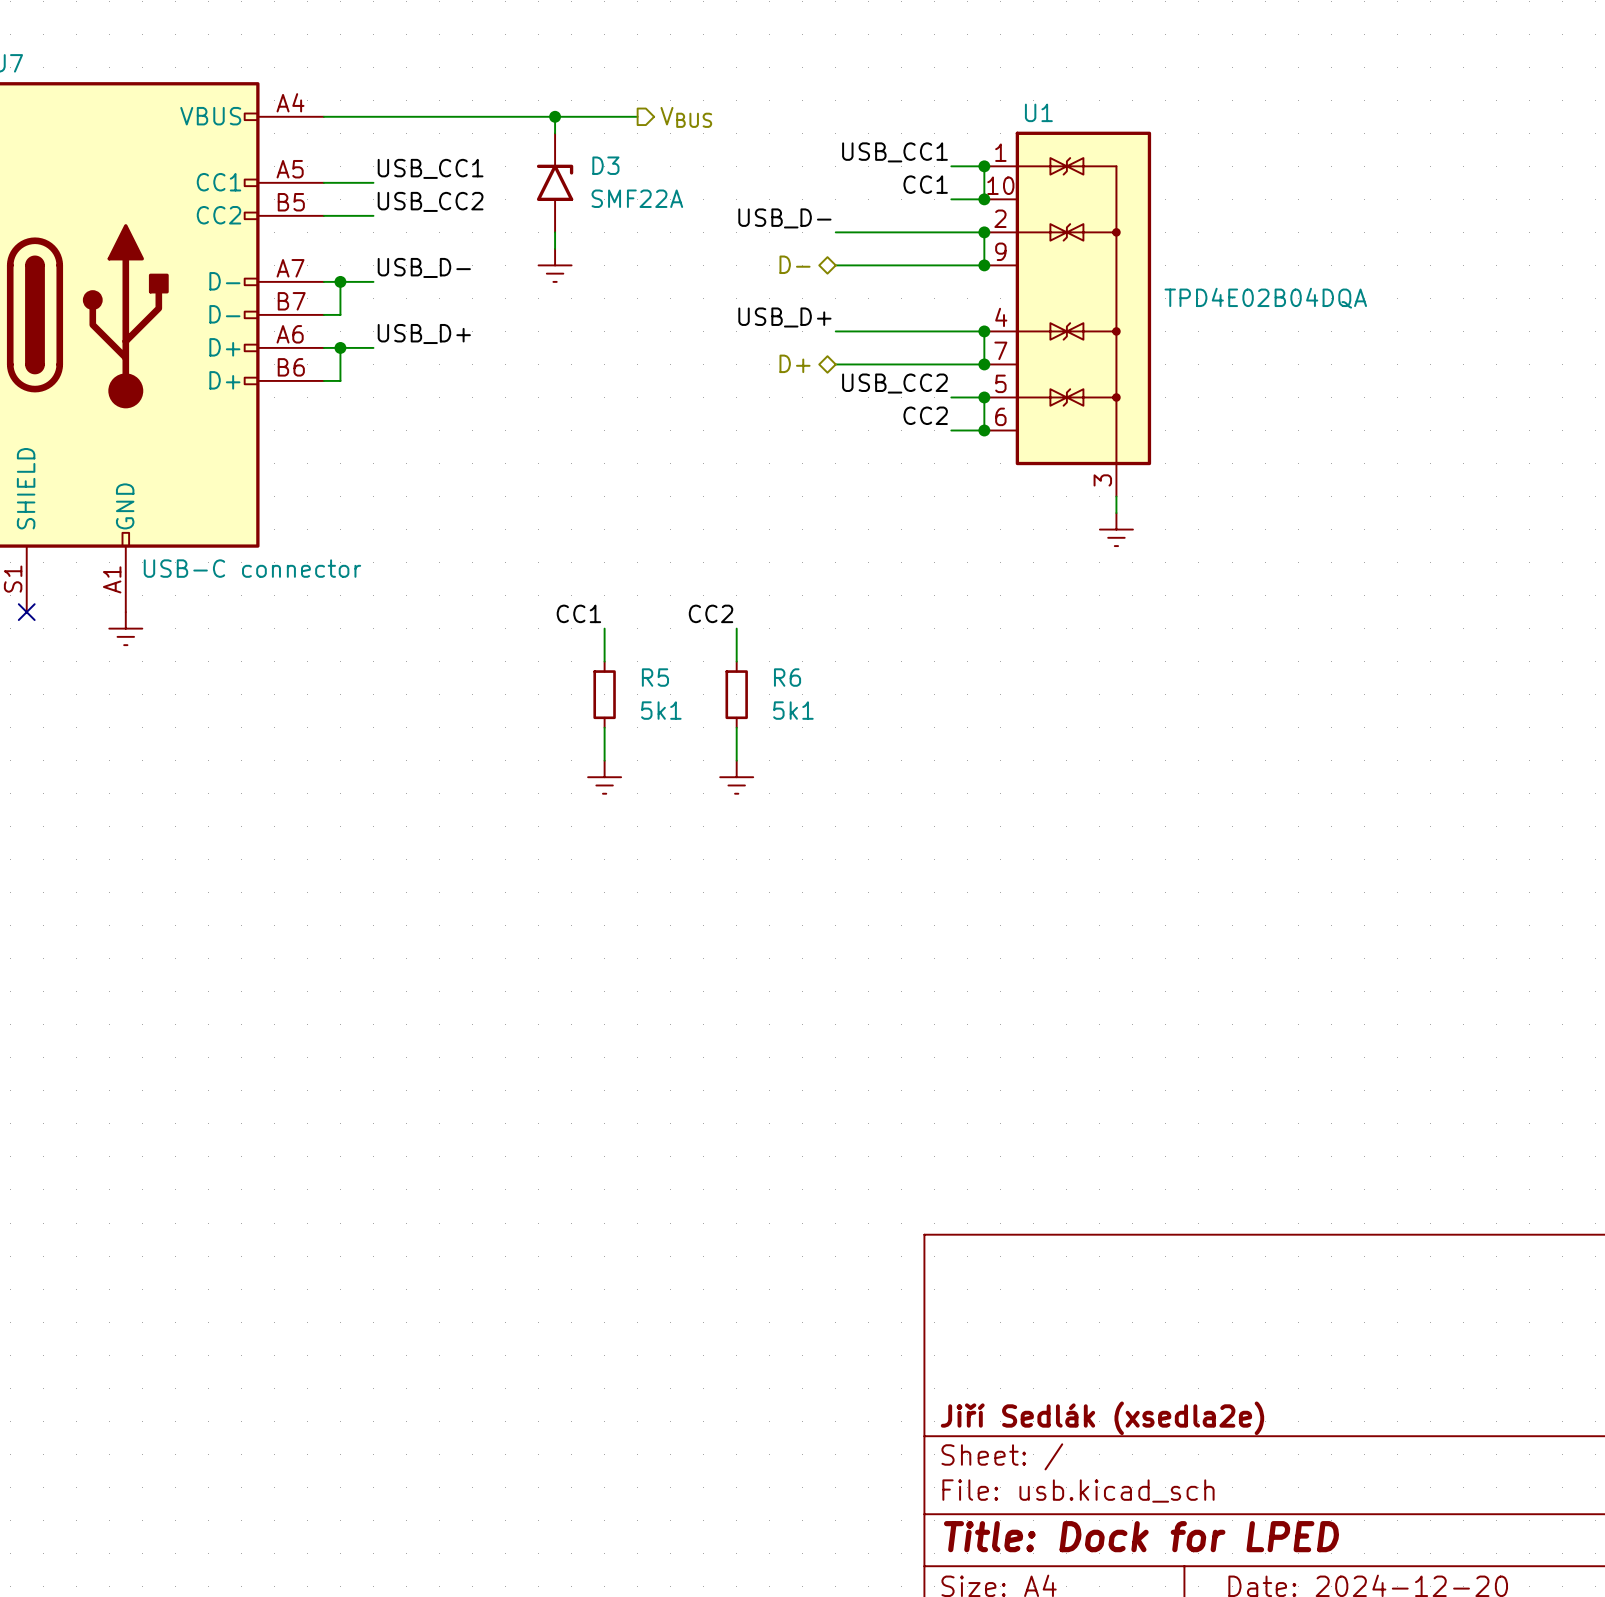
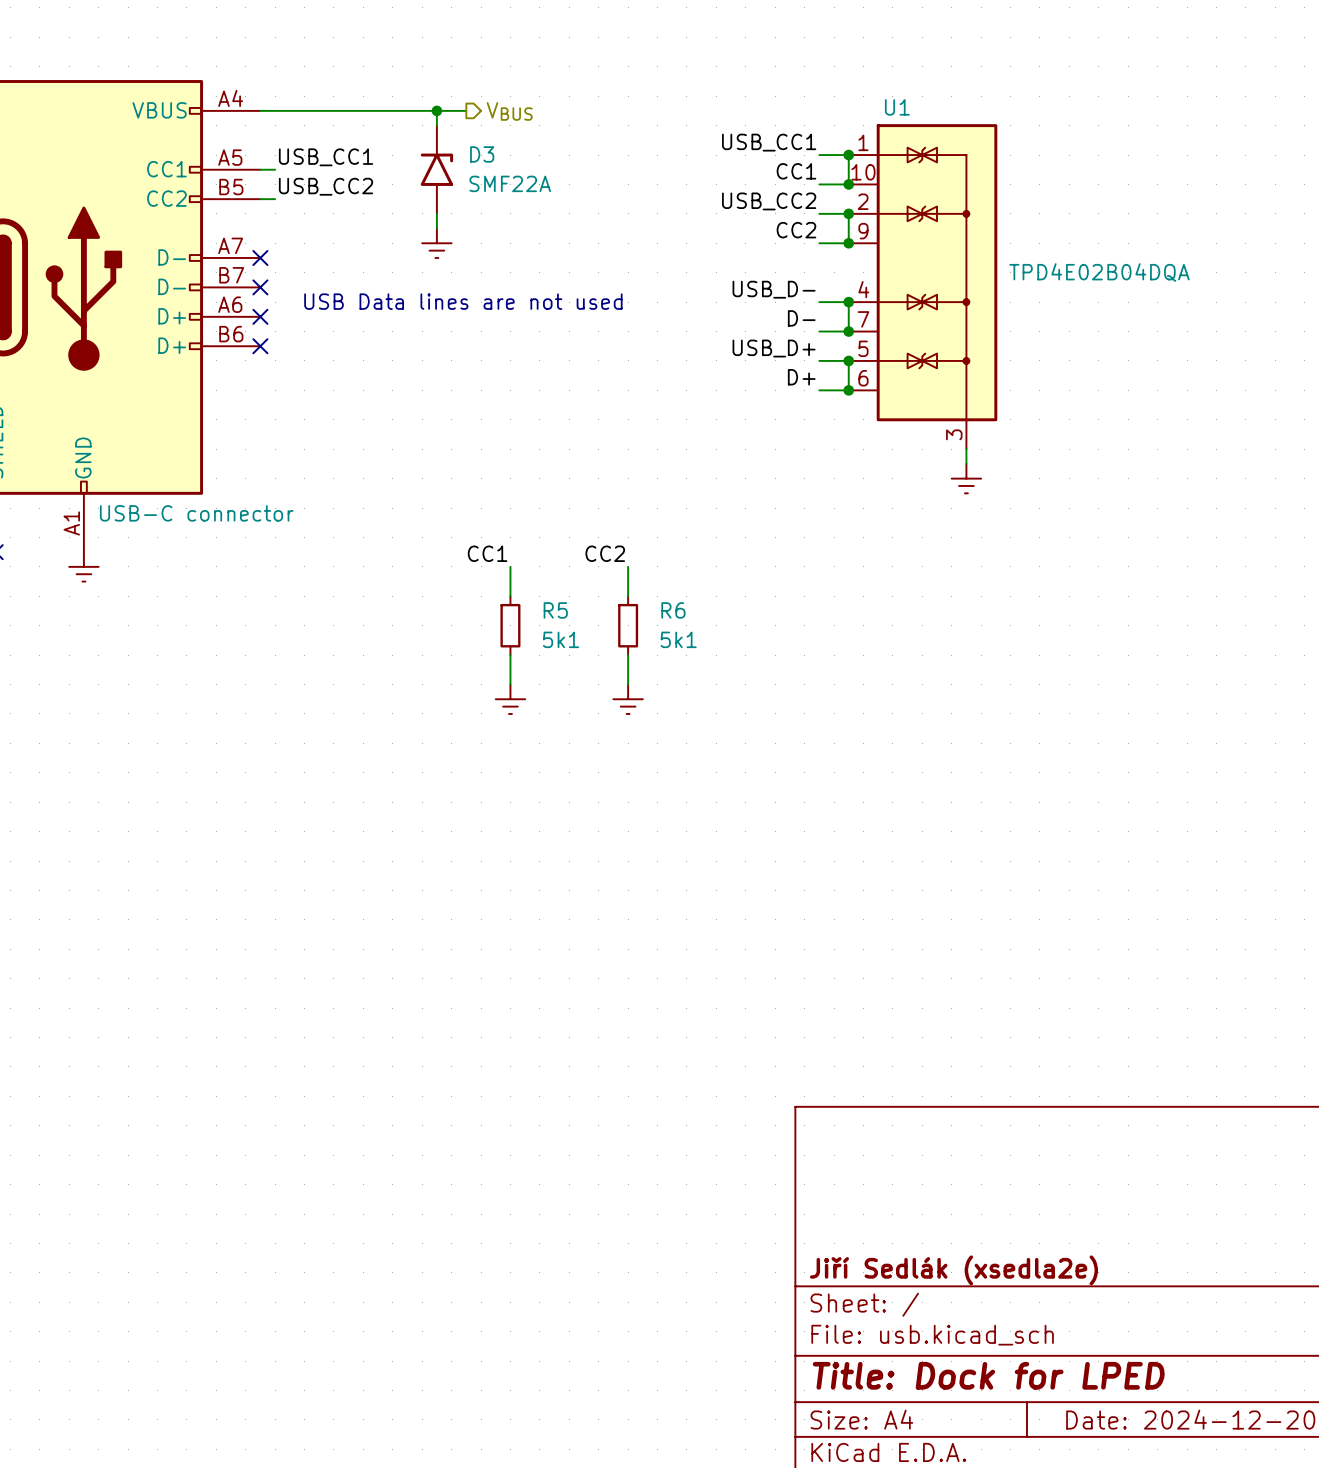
wire: none -> (436, 110) (436, 125)
junction position: (555, 116) -> (436, 110)
wire: (637, 116) (555, 116) (555, 133) -> none
hierarchical label position: VBUS (686, 117) -> VBUS (509, 111)
label position: USB_CC1 (430, 168) -> USB_CC1 (326, 157)
wire: (340, 182) (373, 182) -> none
D3 position: (555, 182) -> (436, 169)
label position: USB_CC2 (430, 201) -> USB_CC2 (326, 186)
wire: (340, 215) (373, 215) -> none
label position: USB_D- (784, 218) -> USB_D- (774, 289)
label: none -> USB_CC2 (769, 201)
wire: (555, 232) (555, 248) -> (436, 213) (436, 228)
wire: (835, 232) (951, 232) -> none
label: none -> CC2 (796, 230)
hierarchical label: D- (795, 264) -> none
power symbol position: (555, 265) -> (436, 243)
wire: (835, 265) (951, 265) -> none
label: USB_D- (424, 267) -> none
wire: (323, 281) (373, 281) -> none
no-connect mark: none -> (260, 257)
wire: (340, 281) (340, 314) (323, 314) -> none
junction: (340, 281) -> none
no-connect mark: none -> (260, 287)
label: USB_D+ (784, 317) -> none
text: none -> USB Data lines are not used (463, 301)
wire: (835, 331) (951, 331) -> none
label: USB_D+ (424, 334) -> none
wire: (323, 347) (373, 347) -> none
no-connect mark: none -> (260, 316)
wire: (340, 347) (340, 380) (323, 380) -> none
junction: (340, 347) -> none
label: none -> D- (801, 318)
hierarchical label: D+ (795, 363) -> none
wire: (835, 364) (951, 364) -> none
no-connect mark: none -> (260, 346)
label: USB_CC2 (894, 383) -> USB_D+ (774, 348)
label: CC2 (925, 415) -> D+ (801, 377)

